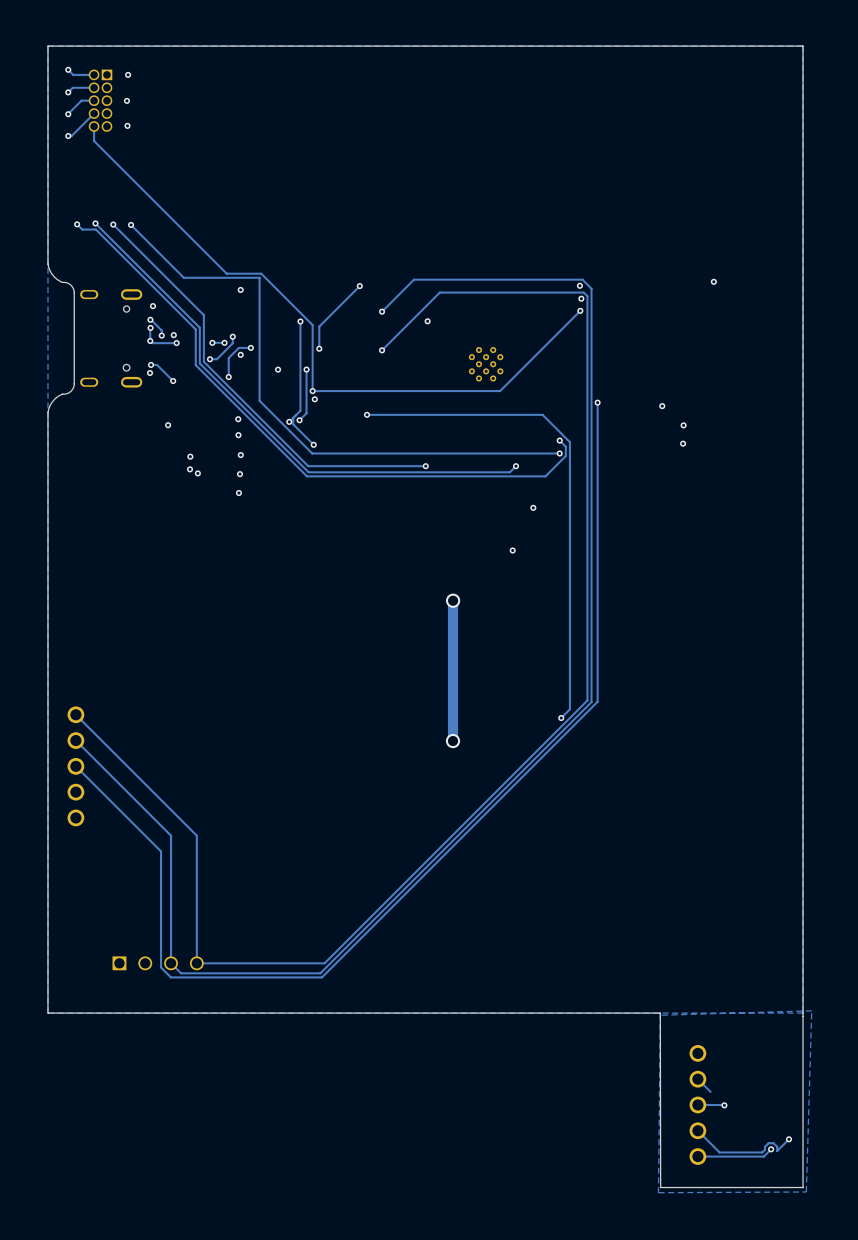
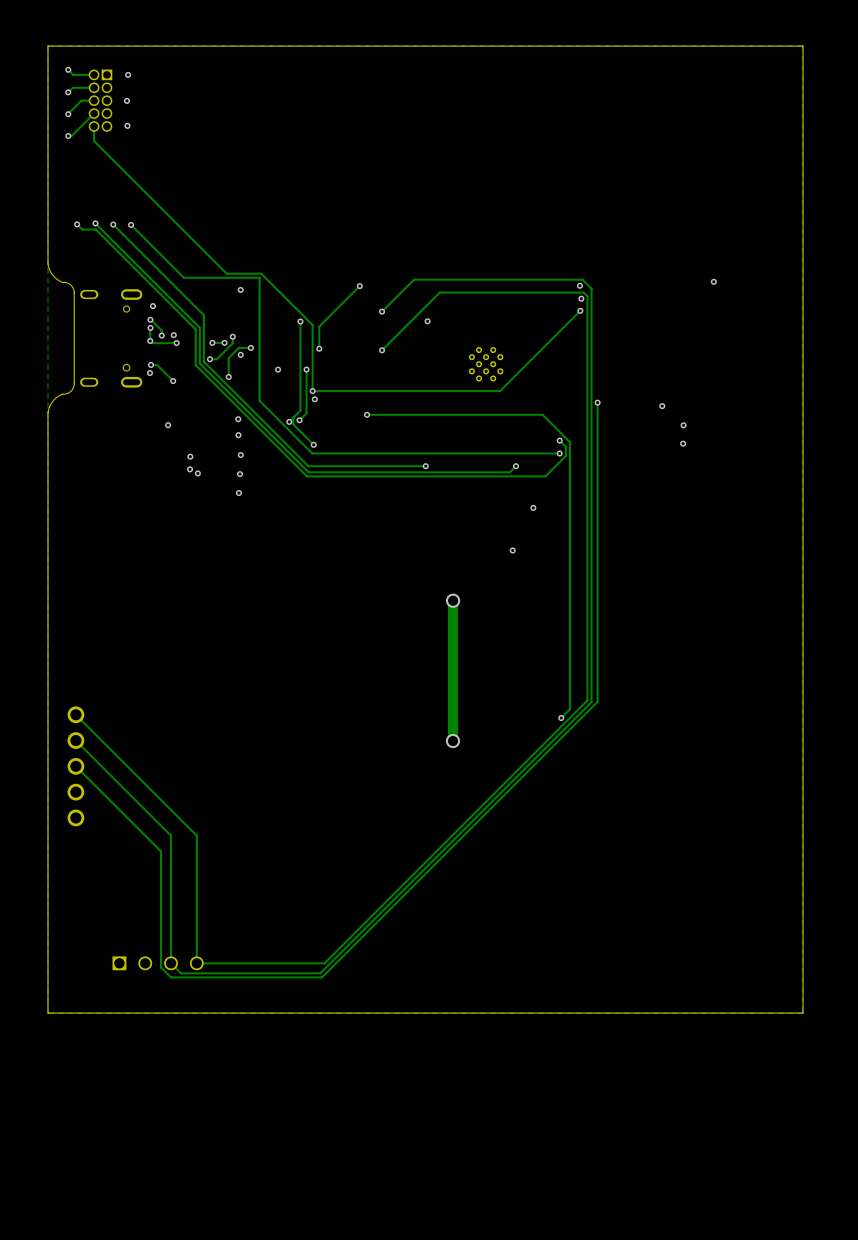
board edge: (803, 1013) (803, 1187) (660, 1187) (660, 1013) -> (803, 1013) (660, 1013)
zone outline: (660, 1014) (658, 1192) (806, 1191) (811, 1010) (660, 1014) -> none
track: (697, 1079) (710, 1091) -> none
track: (697, 1104) (724, 1105) -> none
part: (697, 1104) -> none
via: (724, 1105) -> none
track: (697, 1130) (719, 1152) (762, 1152) (768, 1143) (773, 1143) (777, 1146) (777, 1151) (788, 1139) -> none
via: (788, 1139) -> none
track: (771, 1149) (763, 1156) (697, 1156) -> none
via: (771, 1149) -> none

